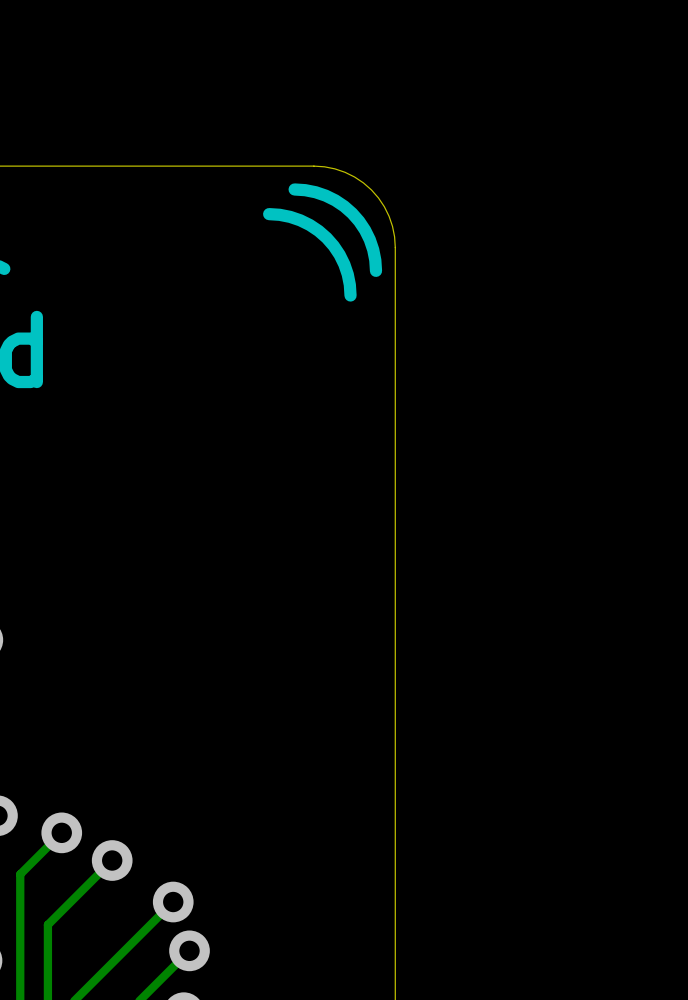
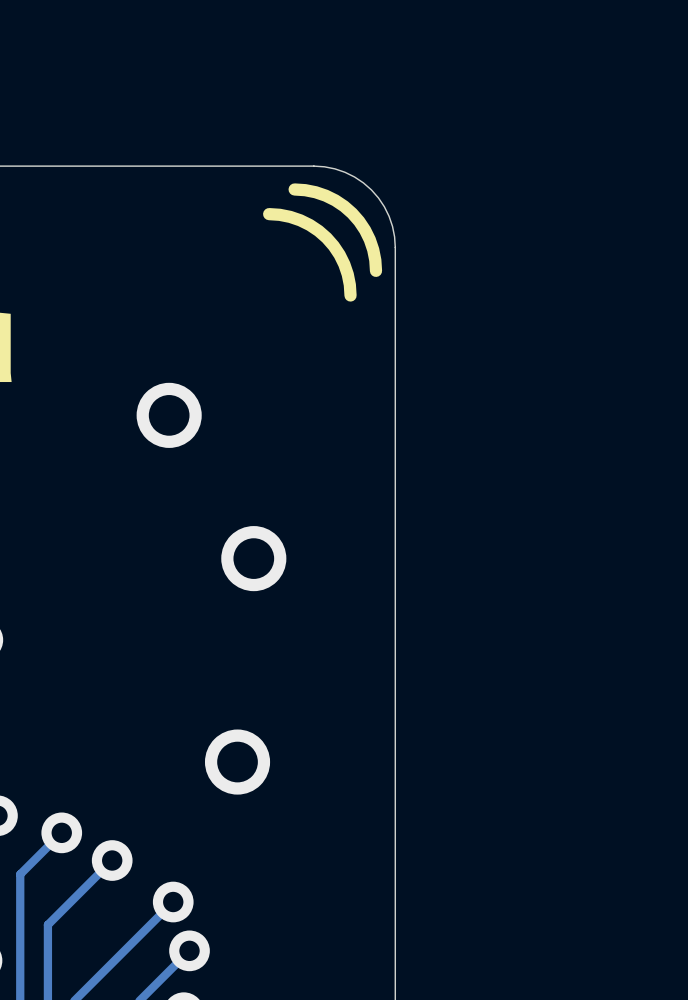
via: none -> (169, 415)
via: none -> (253, 558)
via: none -> (237, 762)

